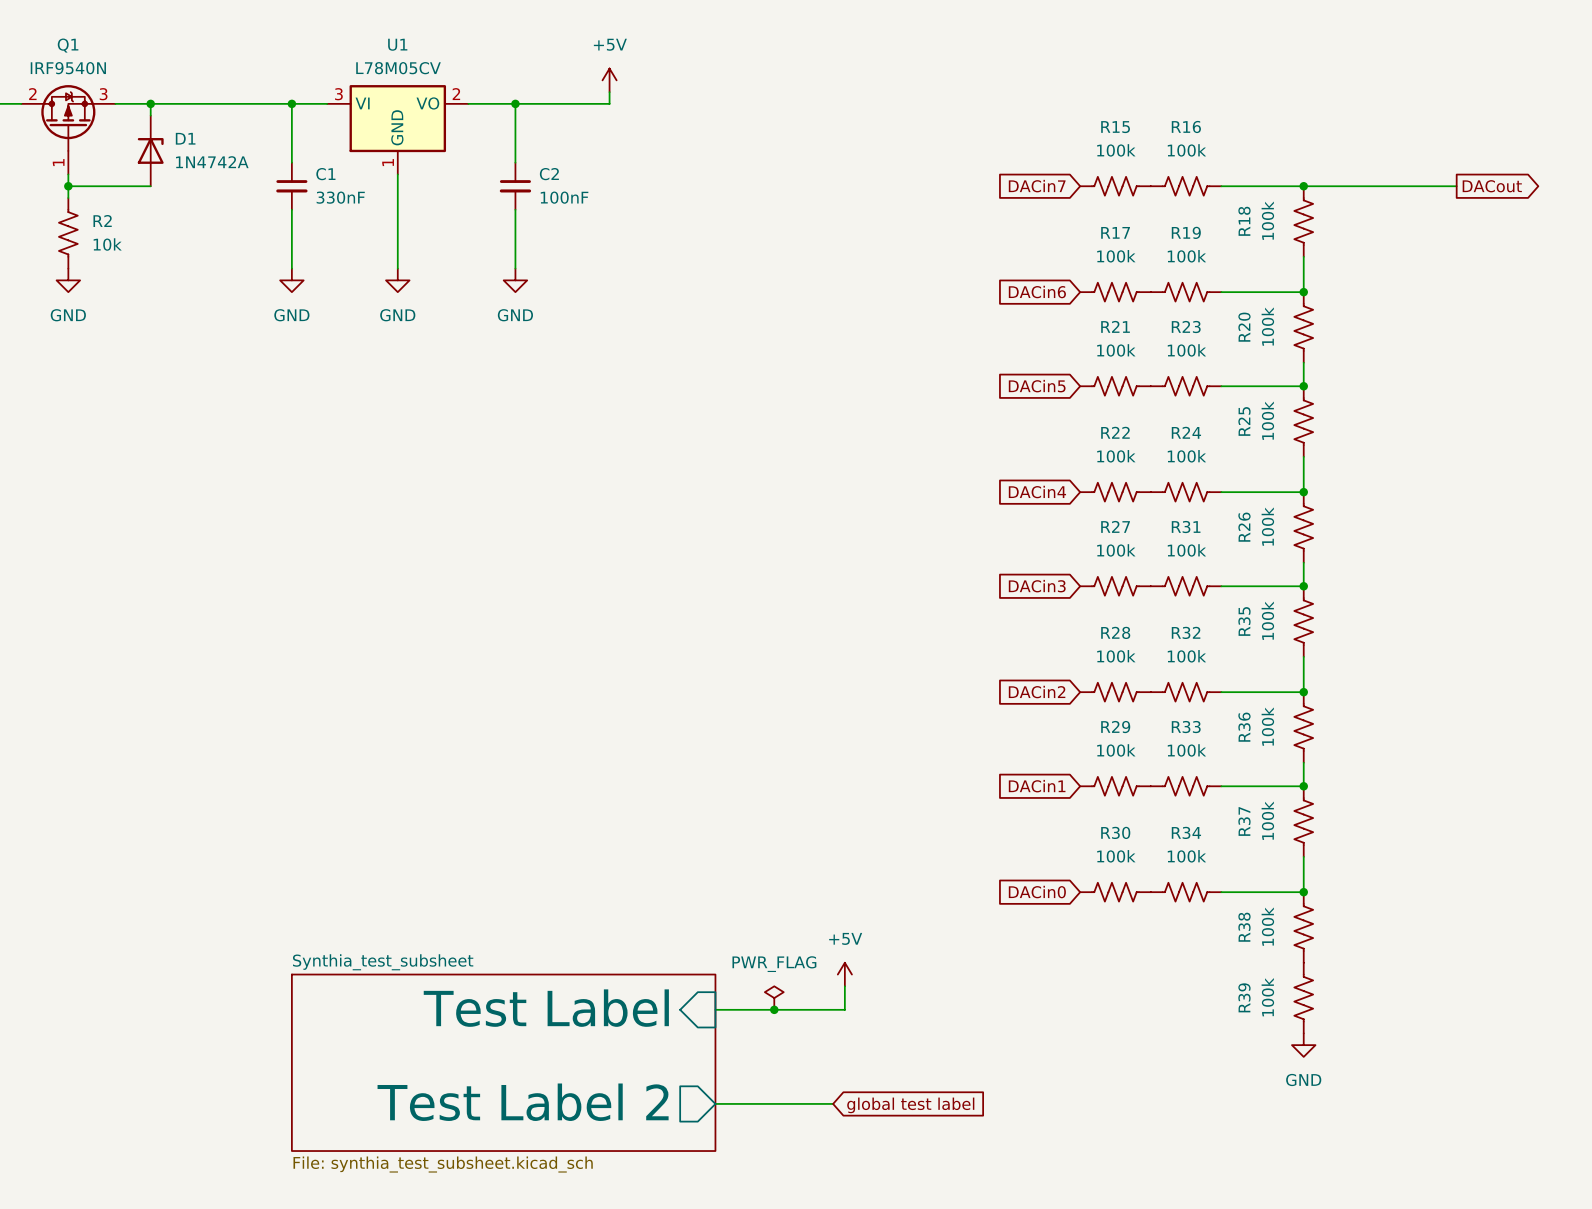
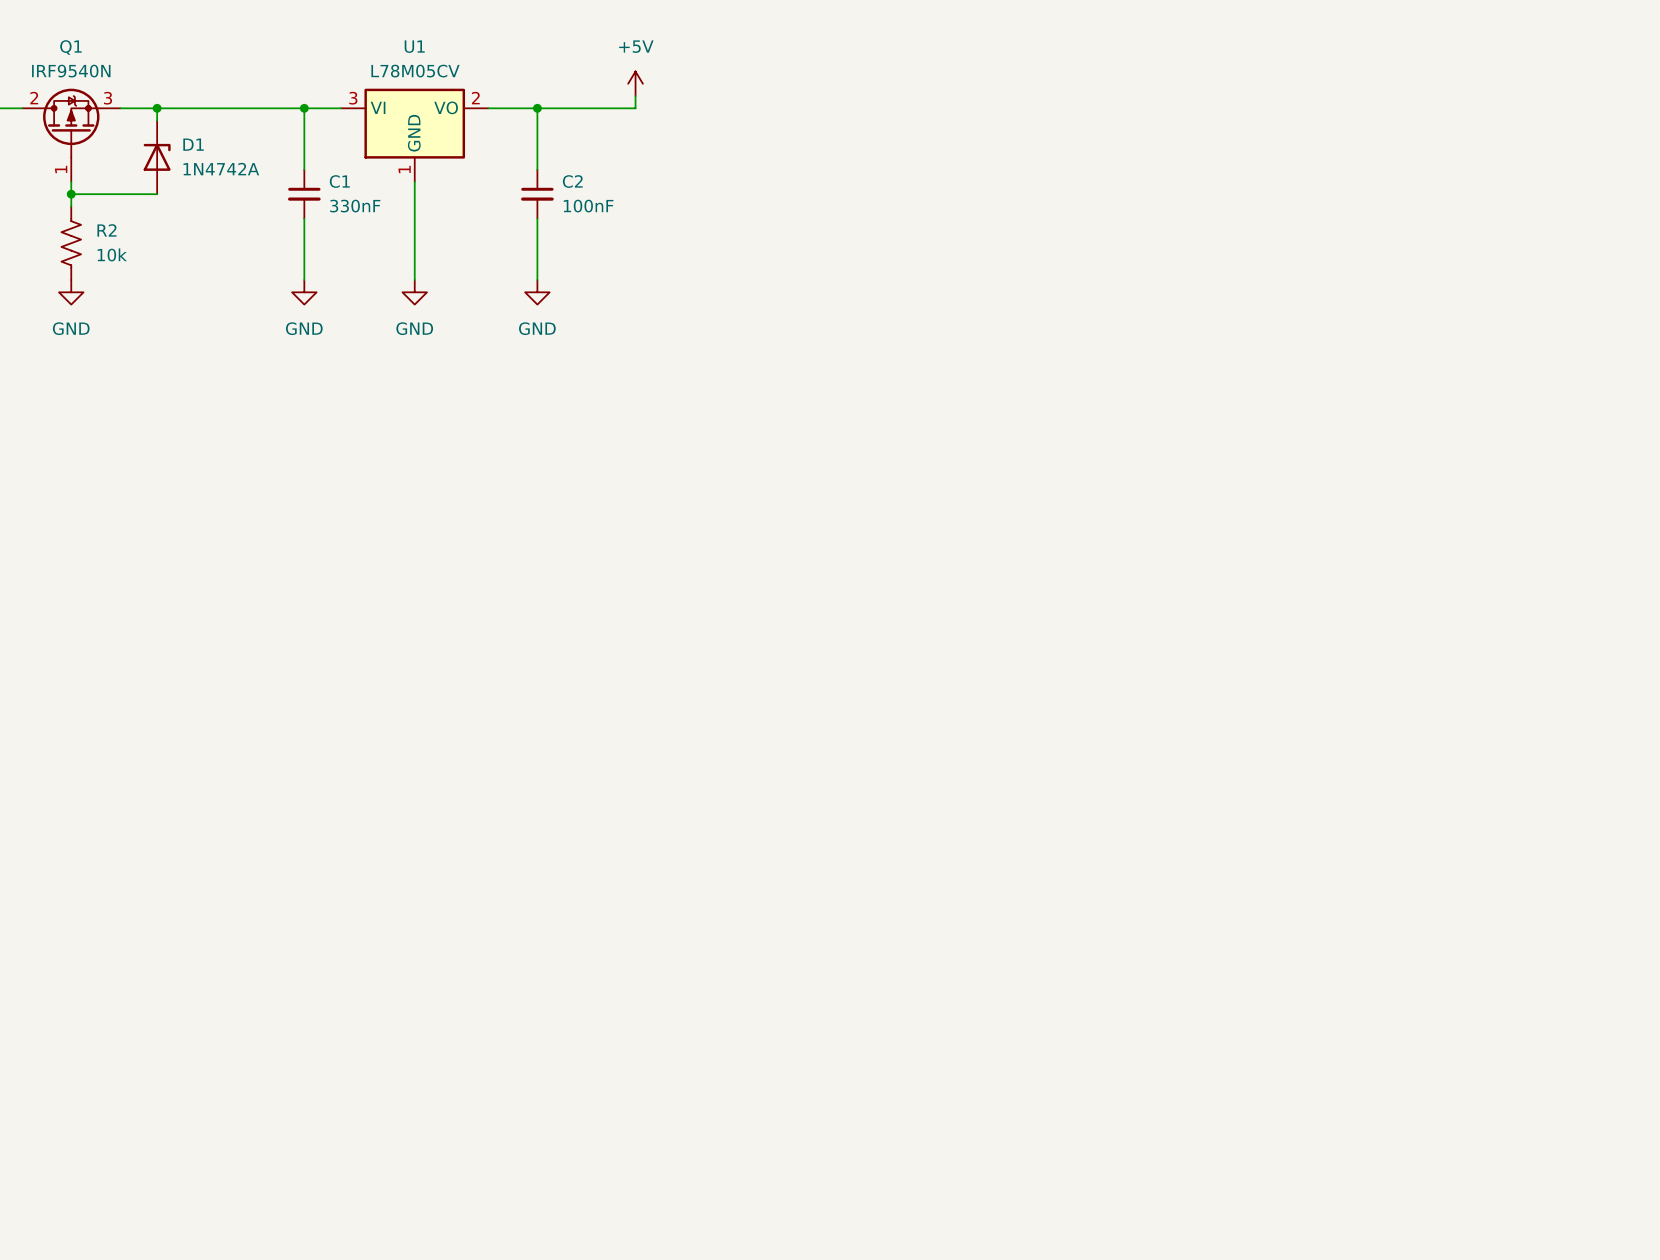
global label: DACin7 (1037, 186) -> none
R15: 100k (1115, 186) -> none
R16: 100k (1186, 186) -> none
wire: (1221, 186) (1456, 186) -> none
junction: (1303, 186) -> none
global label: DACout (1492, 186) -> none
R18: 100k (1303, 221) -> none
wire: (1303, 256) (1303, 292) (1221, 292) -> none
global label: DACin6 (1037, 292) -> none
R17: 100k (1115, 292) -> none
R19: 100k (1186, 292) -> none
junction: (1303, 292) -> none
R20: 100k (1303, 327) -> none
wire: (1303, 362) (1303, 386) (1221, 386) -> none
global label: DACin5 (1037, 386) -> none
R21: 100k (1115, 386) -> none
R23: 100k (1186, 386) -> none
junction: (1303, 386) -> none
R25: 100k (1303, 421) -> none
wire: (1303, 456) (1303, 492) (1221, 492) -> none
global label: DACin4 (1037, 492) -> none
R22: 100k (1115, 492) -> none
R24: 100k (1186, 492) -> none
junction: (1303, 492) -> none
R26: 100k (1303, 527) -> none
wire: (1303, 562) (1303, 586) (1221, 586) -> none
global label: DACin3 (1037, 586) -> none
R27: 100k (1115, 586) -> none
R31: 100k (1186, 586) -> none
junction: (1303, 586) -> none
R35: 100k (1303, 621) -> none
wire: (1303, 656) (1303, 692) (1221, 692) -> none
global label: DACin2 (1037, 692) -> none
R28: 100k (1115, 692) -> none
R32: 100k (1186, 692) -> none
junction: (1303, 692) -> none
R36: 100k (1303, 727) -> none
wire: (1303, 762) (1303, 786) (1221, 786) -> none
global label: DACin1 (1037, 786) -> none
R29: 100k (1115, 786) -> none
R33: 100k (1186, 786) -> none
junction: (1303, 786) -> none
R37: 100k (1303, 821) -> none
wire: (1303, 856) (1303, 892) (1221, 892) -> none
global label: DACin0 (1037, 892) -> none
R30: 100k (1115, 892) -> none
R34: 100k (1186, 892) -> none
junction: (1303, 892) -> none
R38: 100k (1303, 927) -> none
power symbol: +5V (844, 974) -> none
wire: (844, 986) (844, 1009) (715, 1009) -> none
power symbol: PWR_FLAG (774, 998) -> none
R39: 100k (1303, 998) -> none
sheet pin: Test Label (546, 1008) -> none
junction: (774, 1009) -> none
power symbol: GND (1303, 1045) -> none
sheet Synthia_test_subsheet: File: synthia_test_subsheet.kicad_sch (503, 1062) -> none
sheet pin: Test Label 2 (523, 1102) -> none
wire: (715, 1103) (833, 1103) -> none
global label: global test label (910, 1105) -> none

